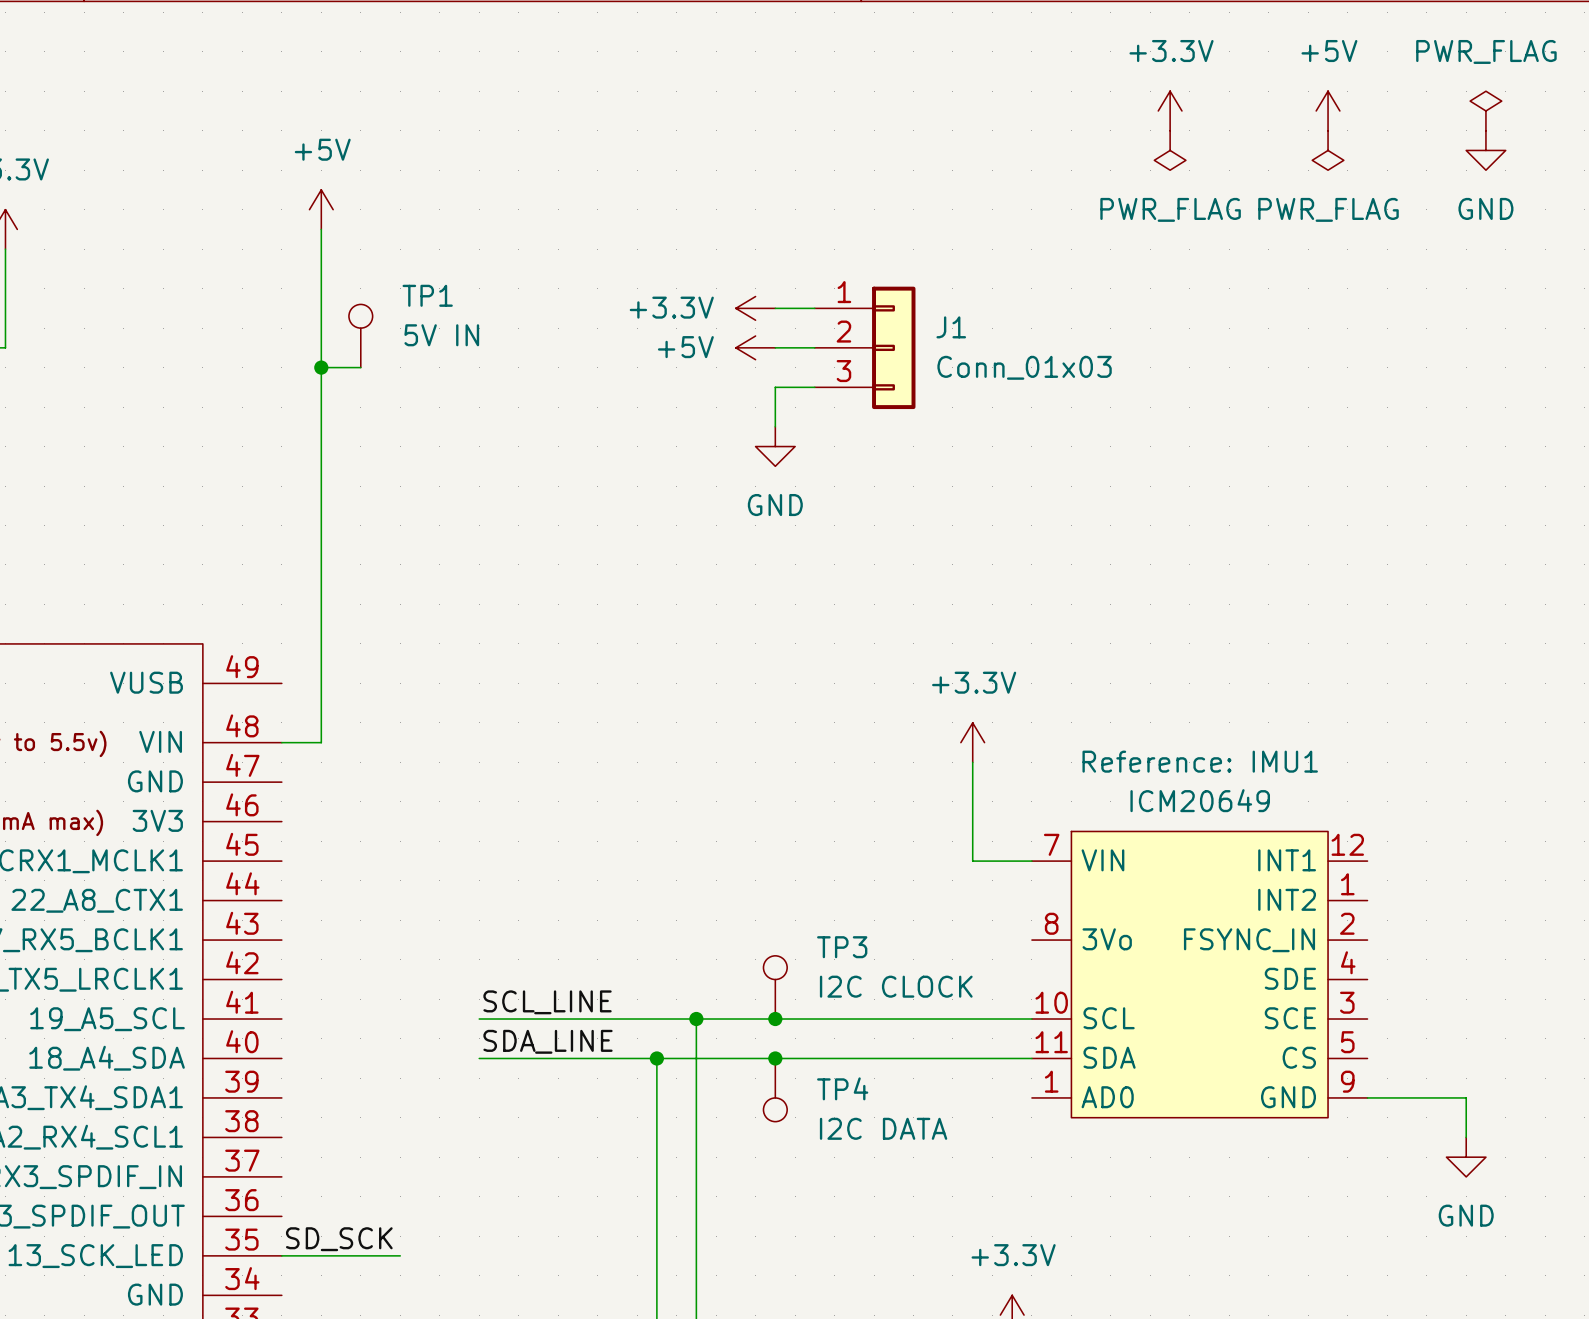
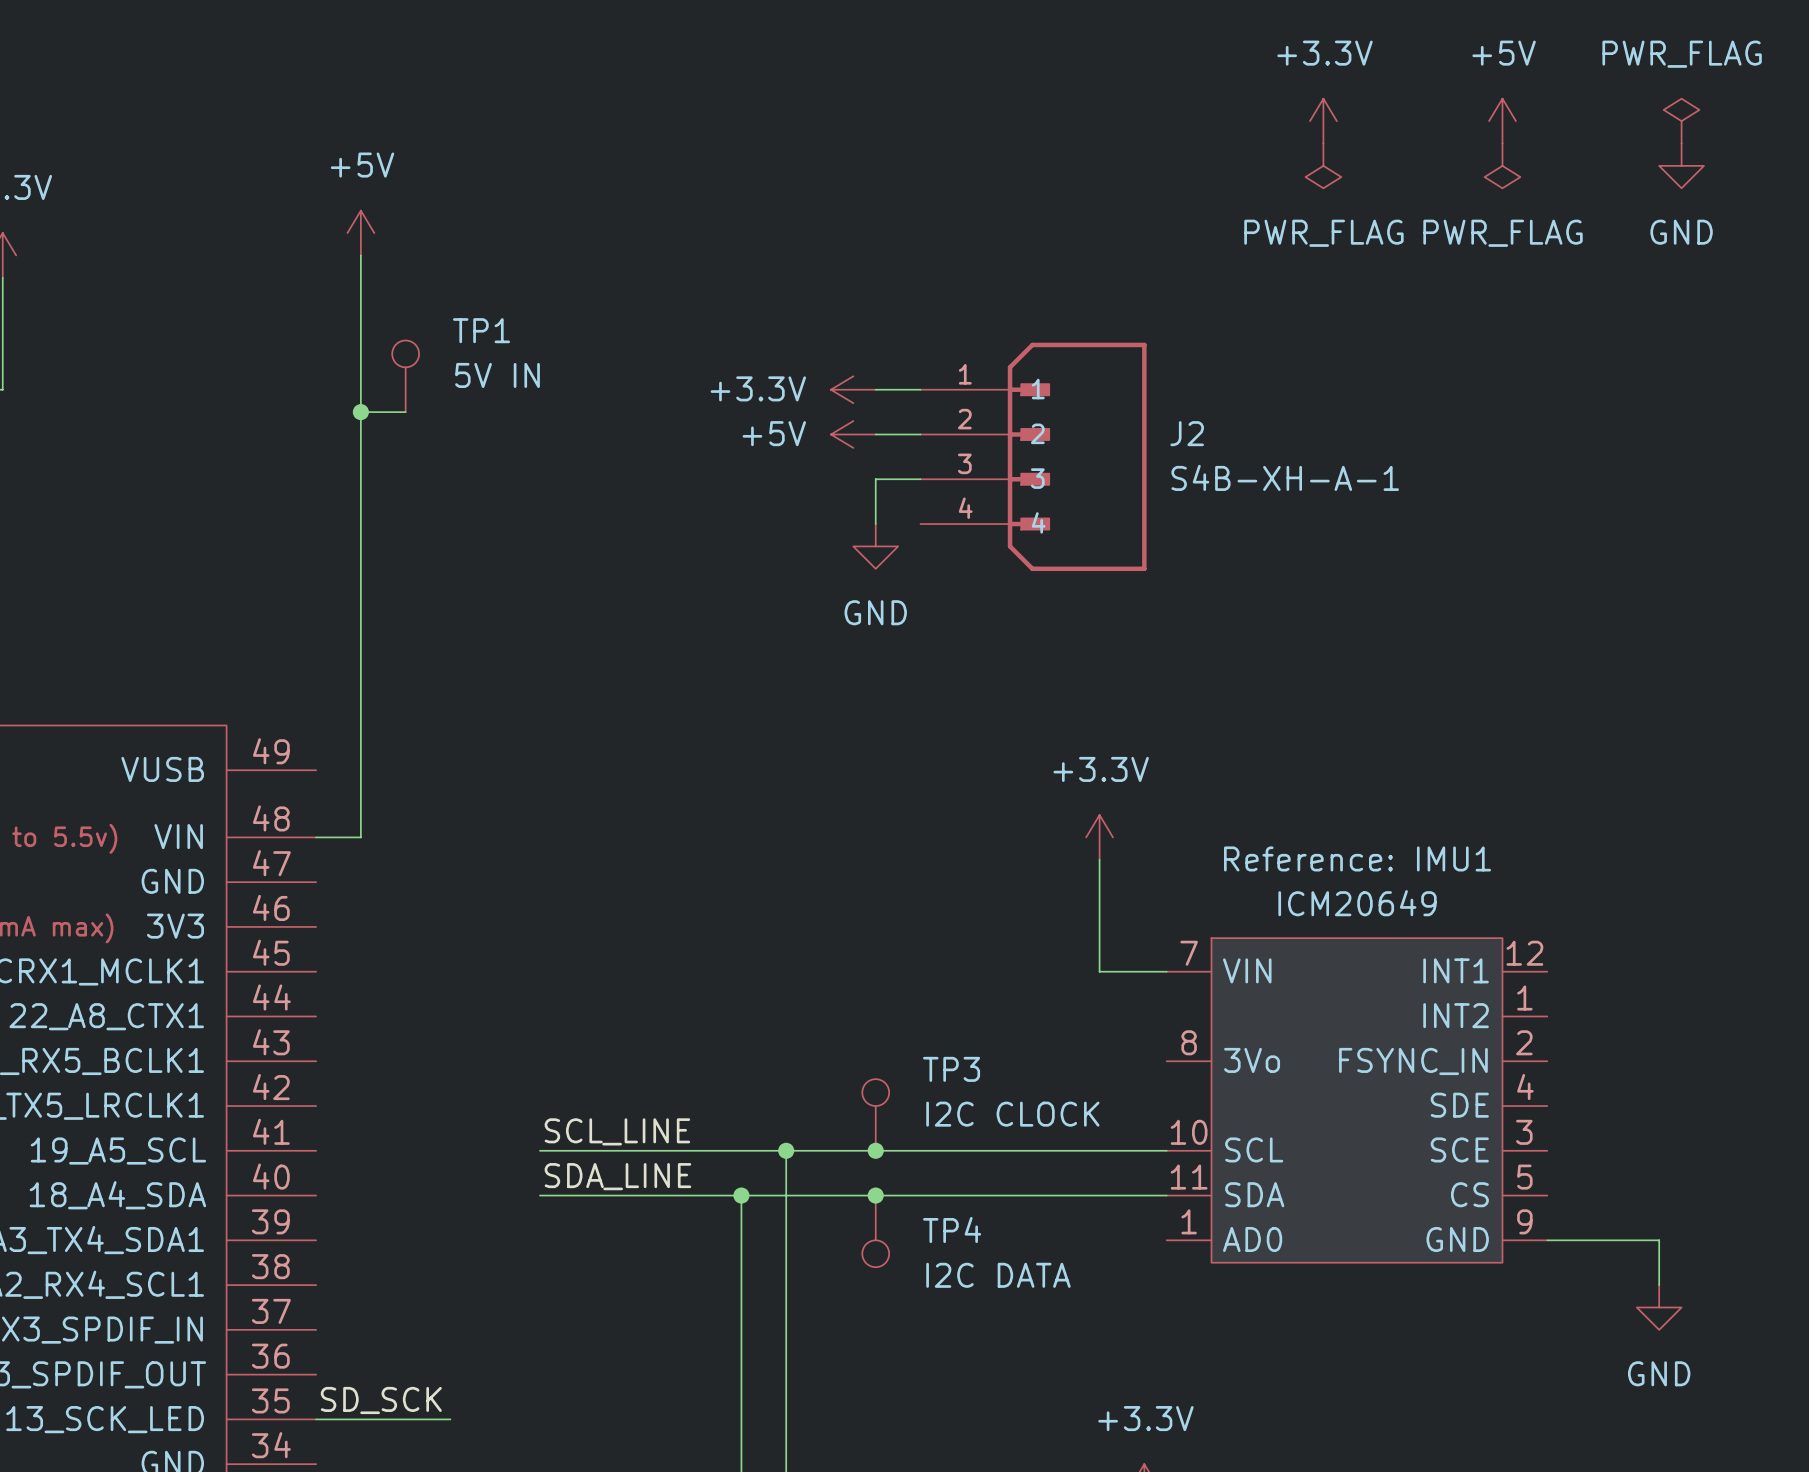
power symbol: +3.3V (755, 308) -> none
wire: (775, 308) (814, 308) -> none
power symbol: +5V (755, 347) -> +3.3V (853, 389)
J1: Conn_01x03 (865, 347) -> none
power symbol: none -> +5V (853, 434)
wire: (775, 387) (775, 426) -> none
J2: none -> S4B-XH-A-1 (1033, 456)
wire: none -> (920, 479) (875, 479) (875, 524)
power symbol position: GND (775, 446) -> GND (875, 546)

